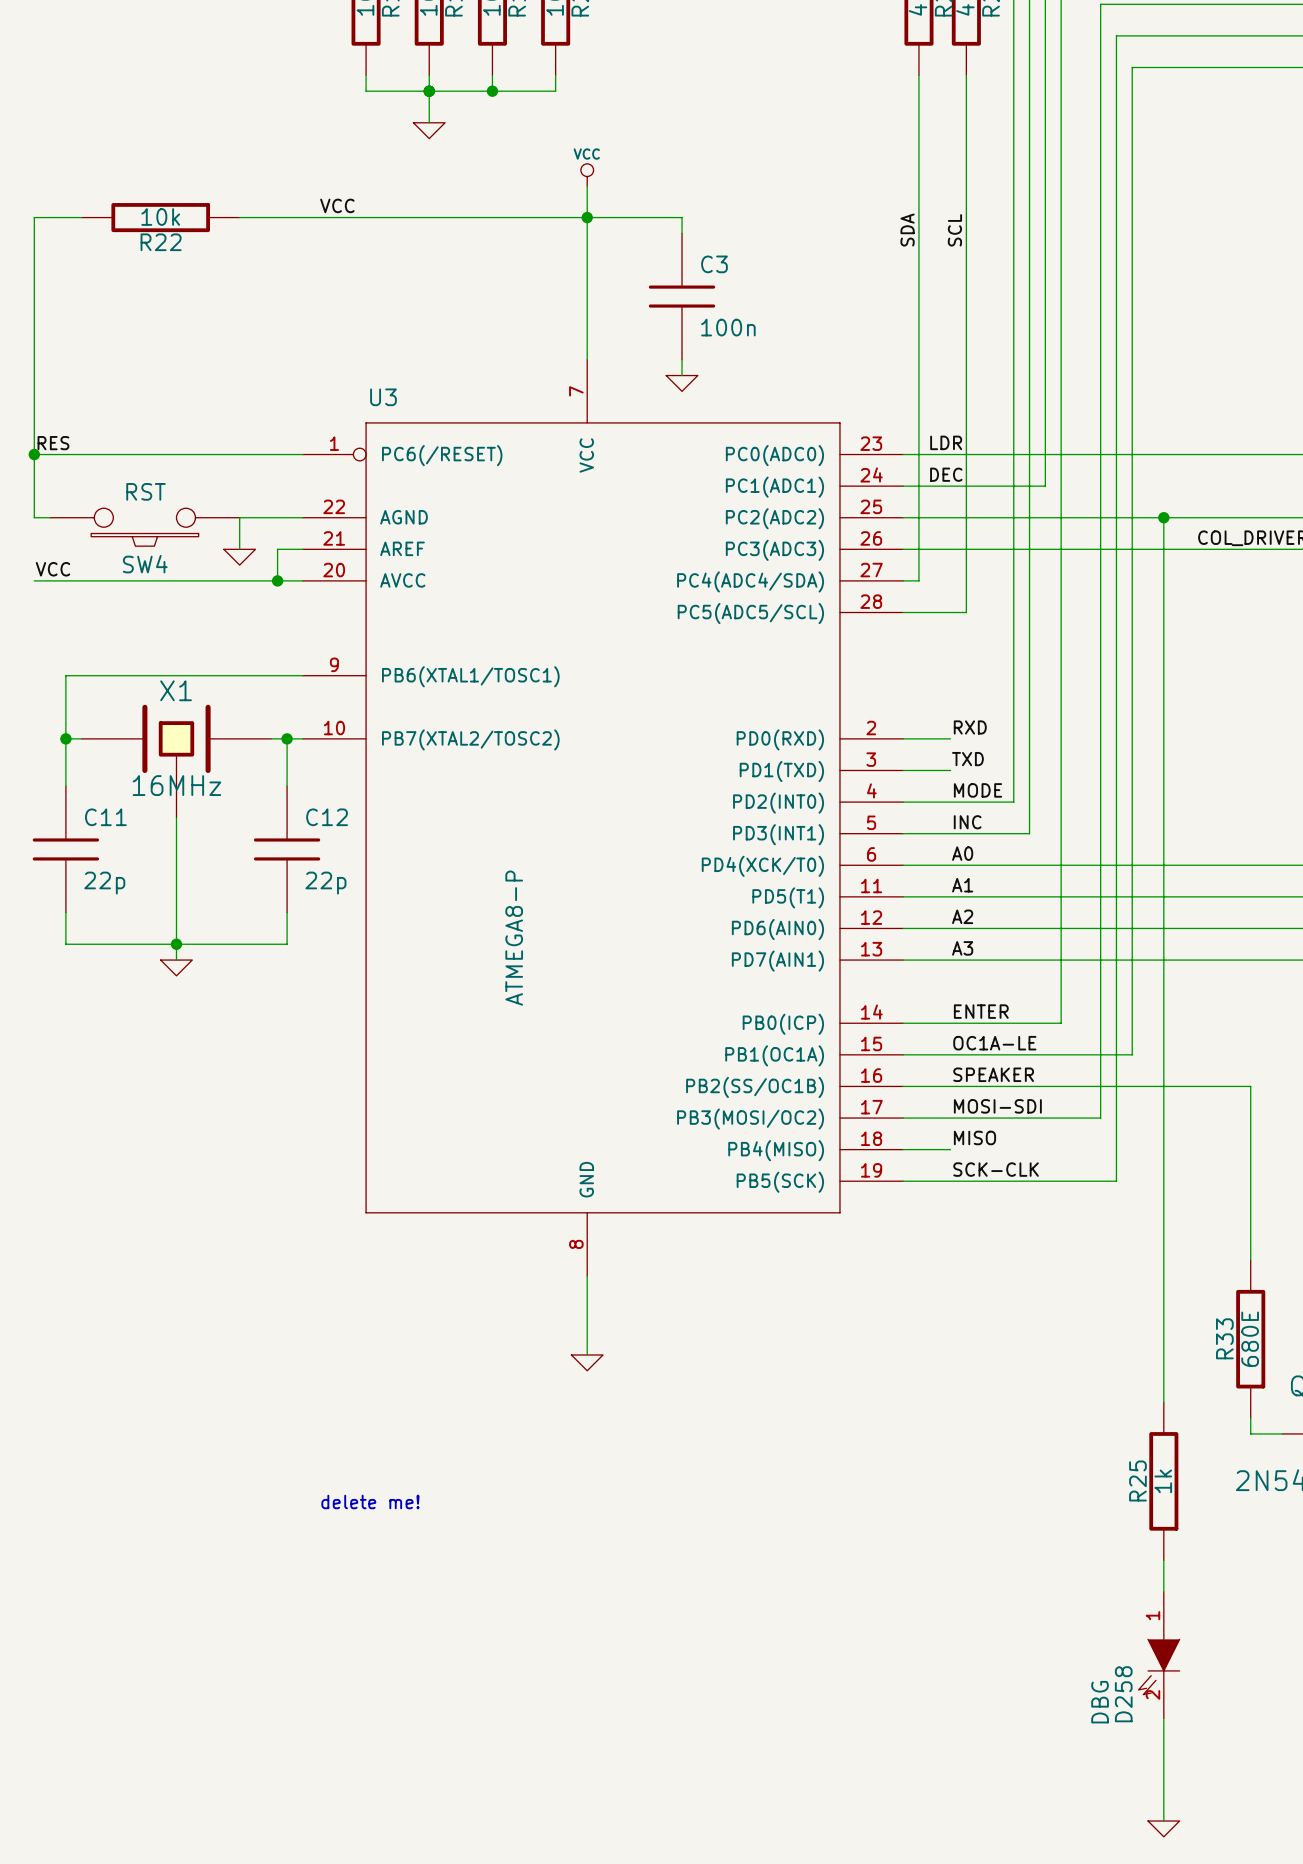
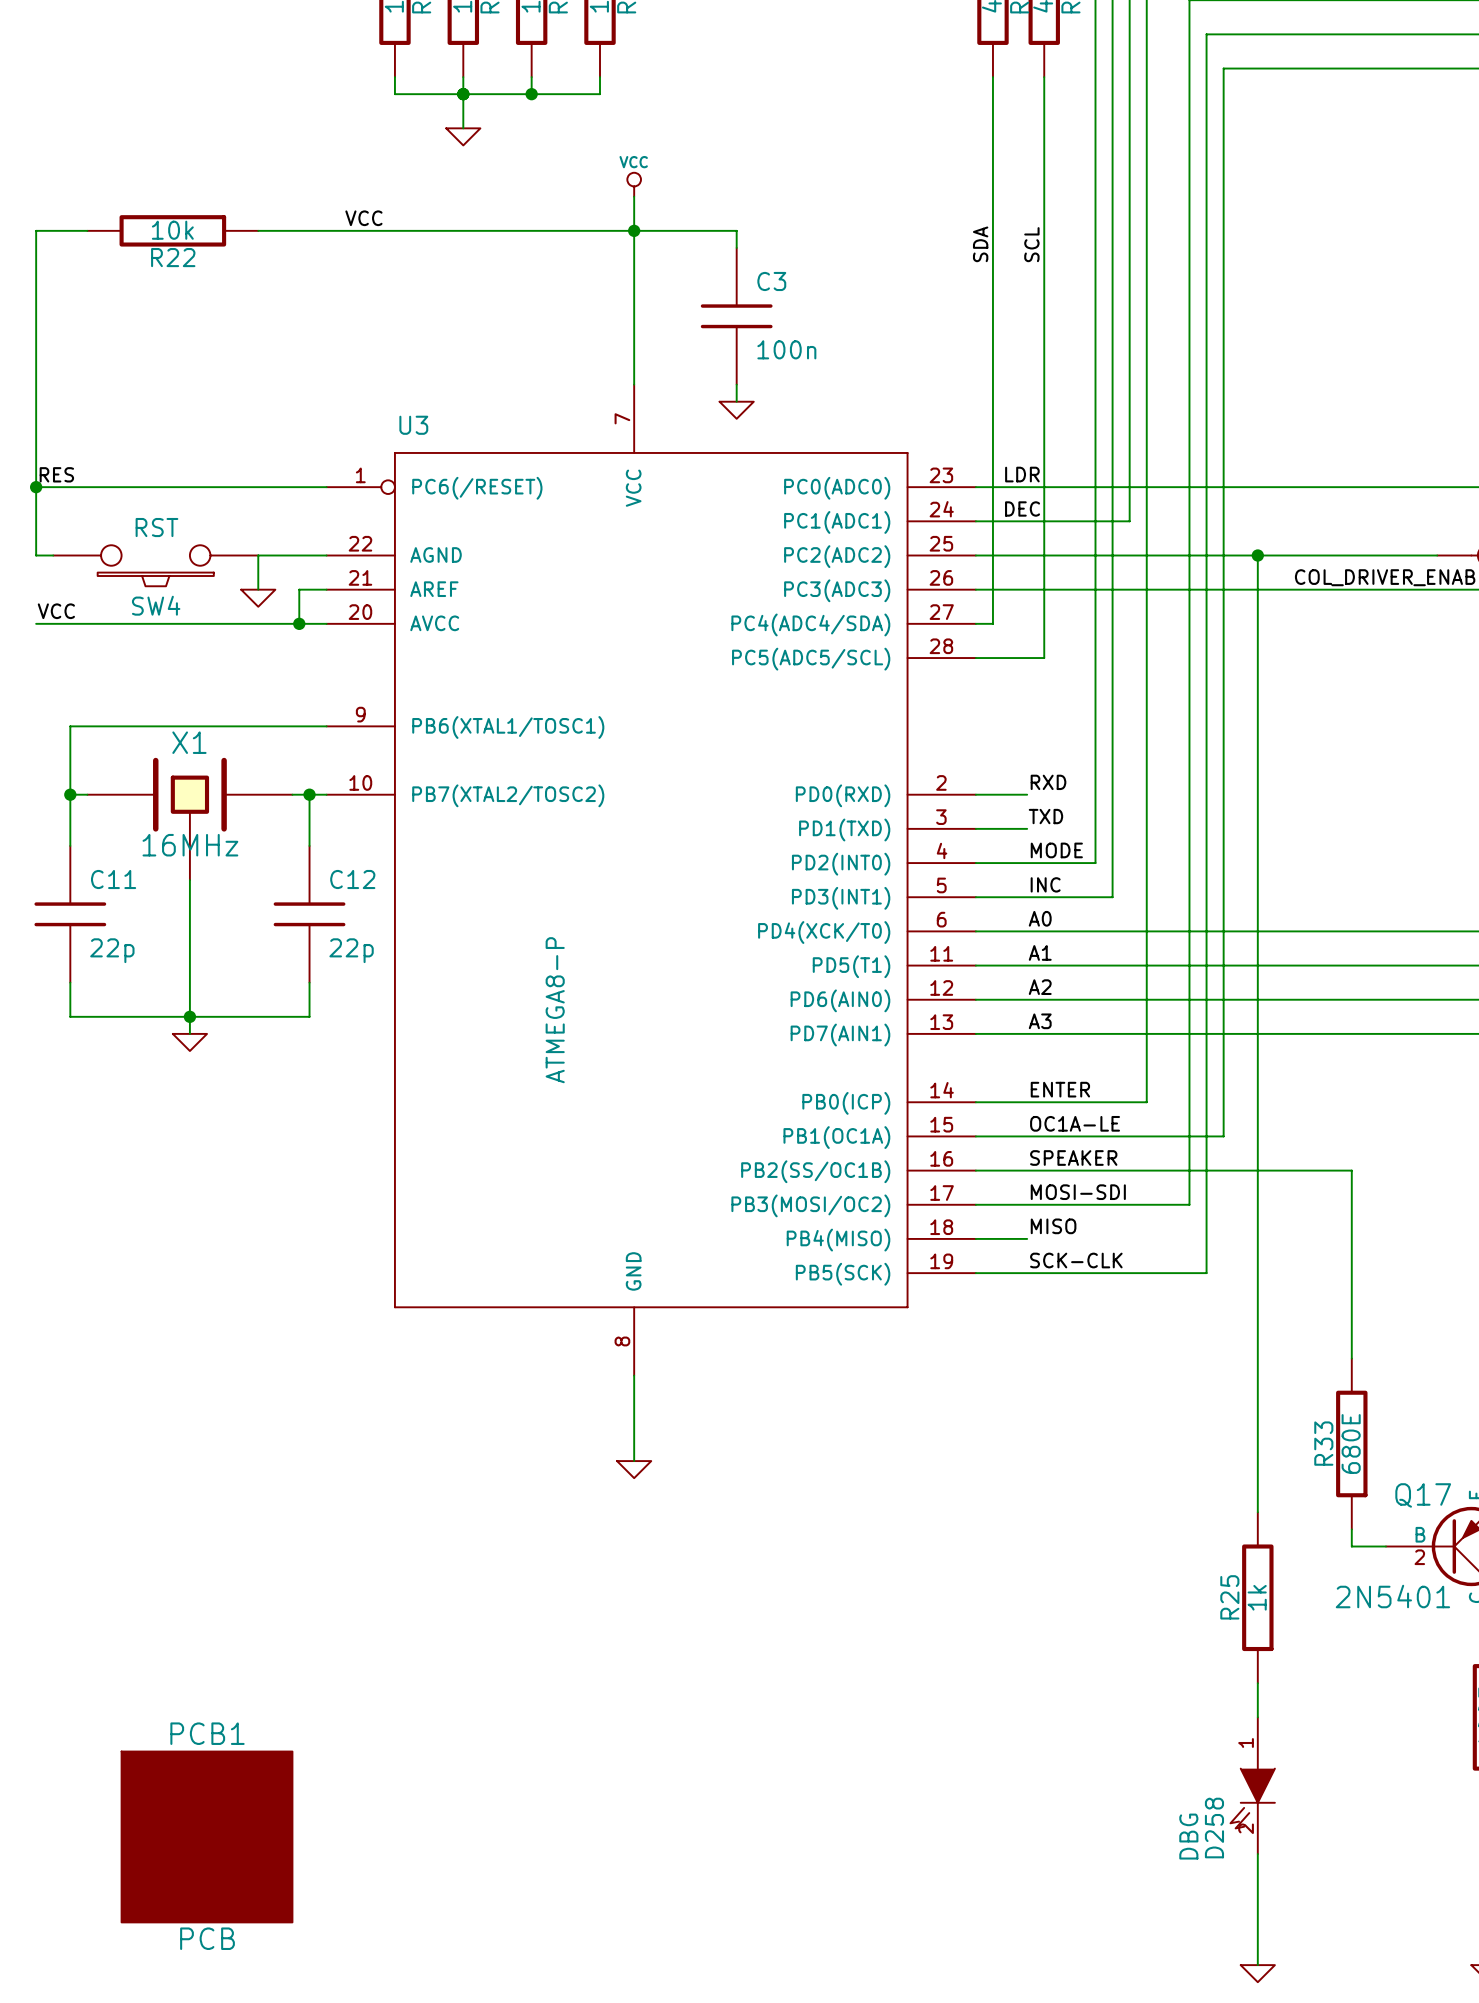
text: delete me! (370, 1501) -> none
PCB1: none -> PCB (207, 1836)

